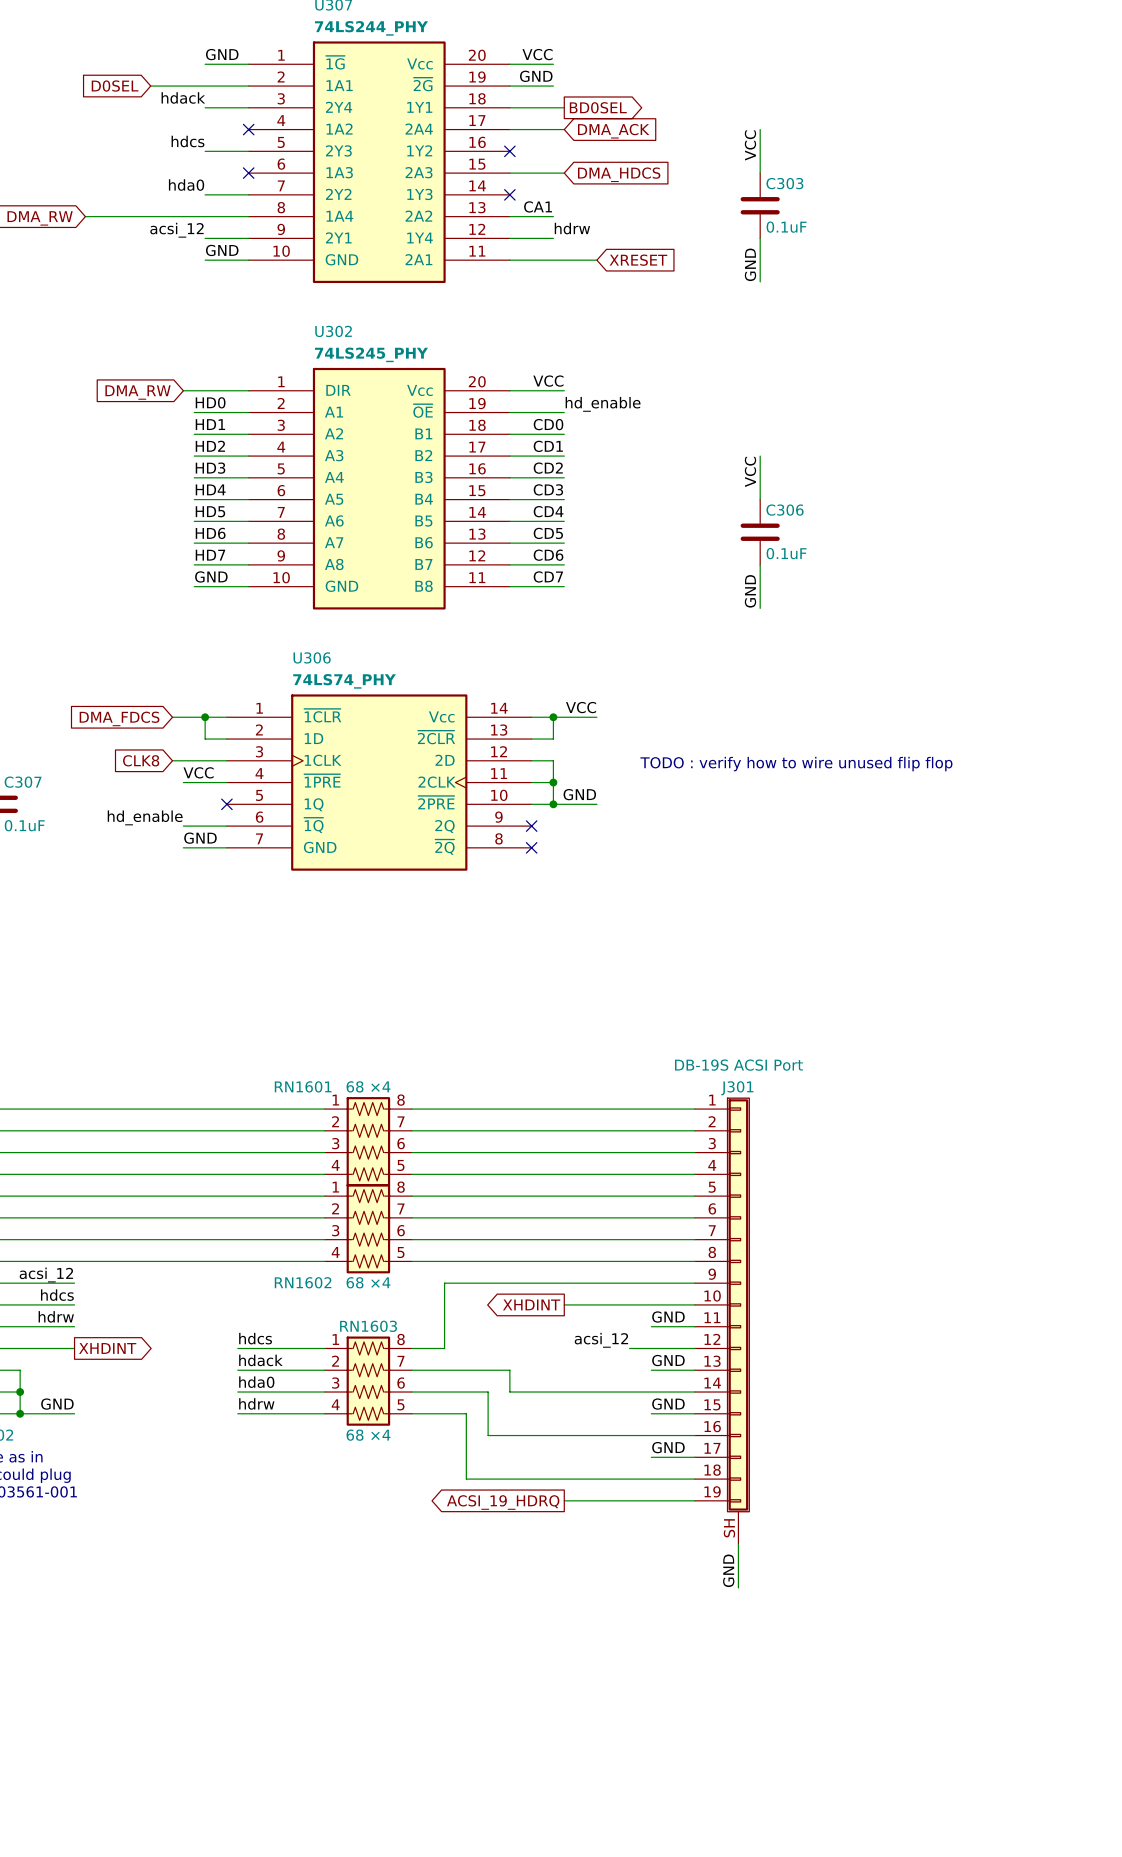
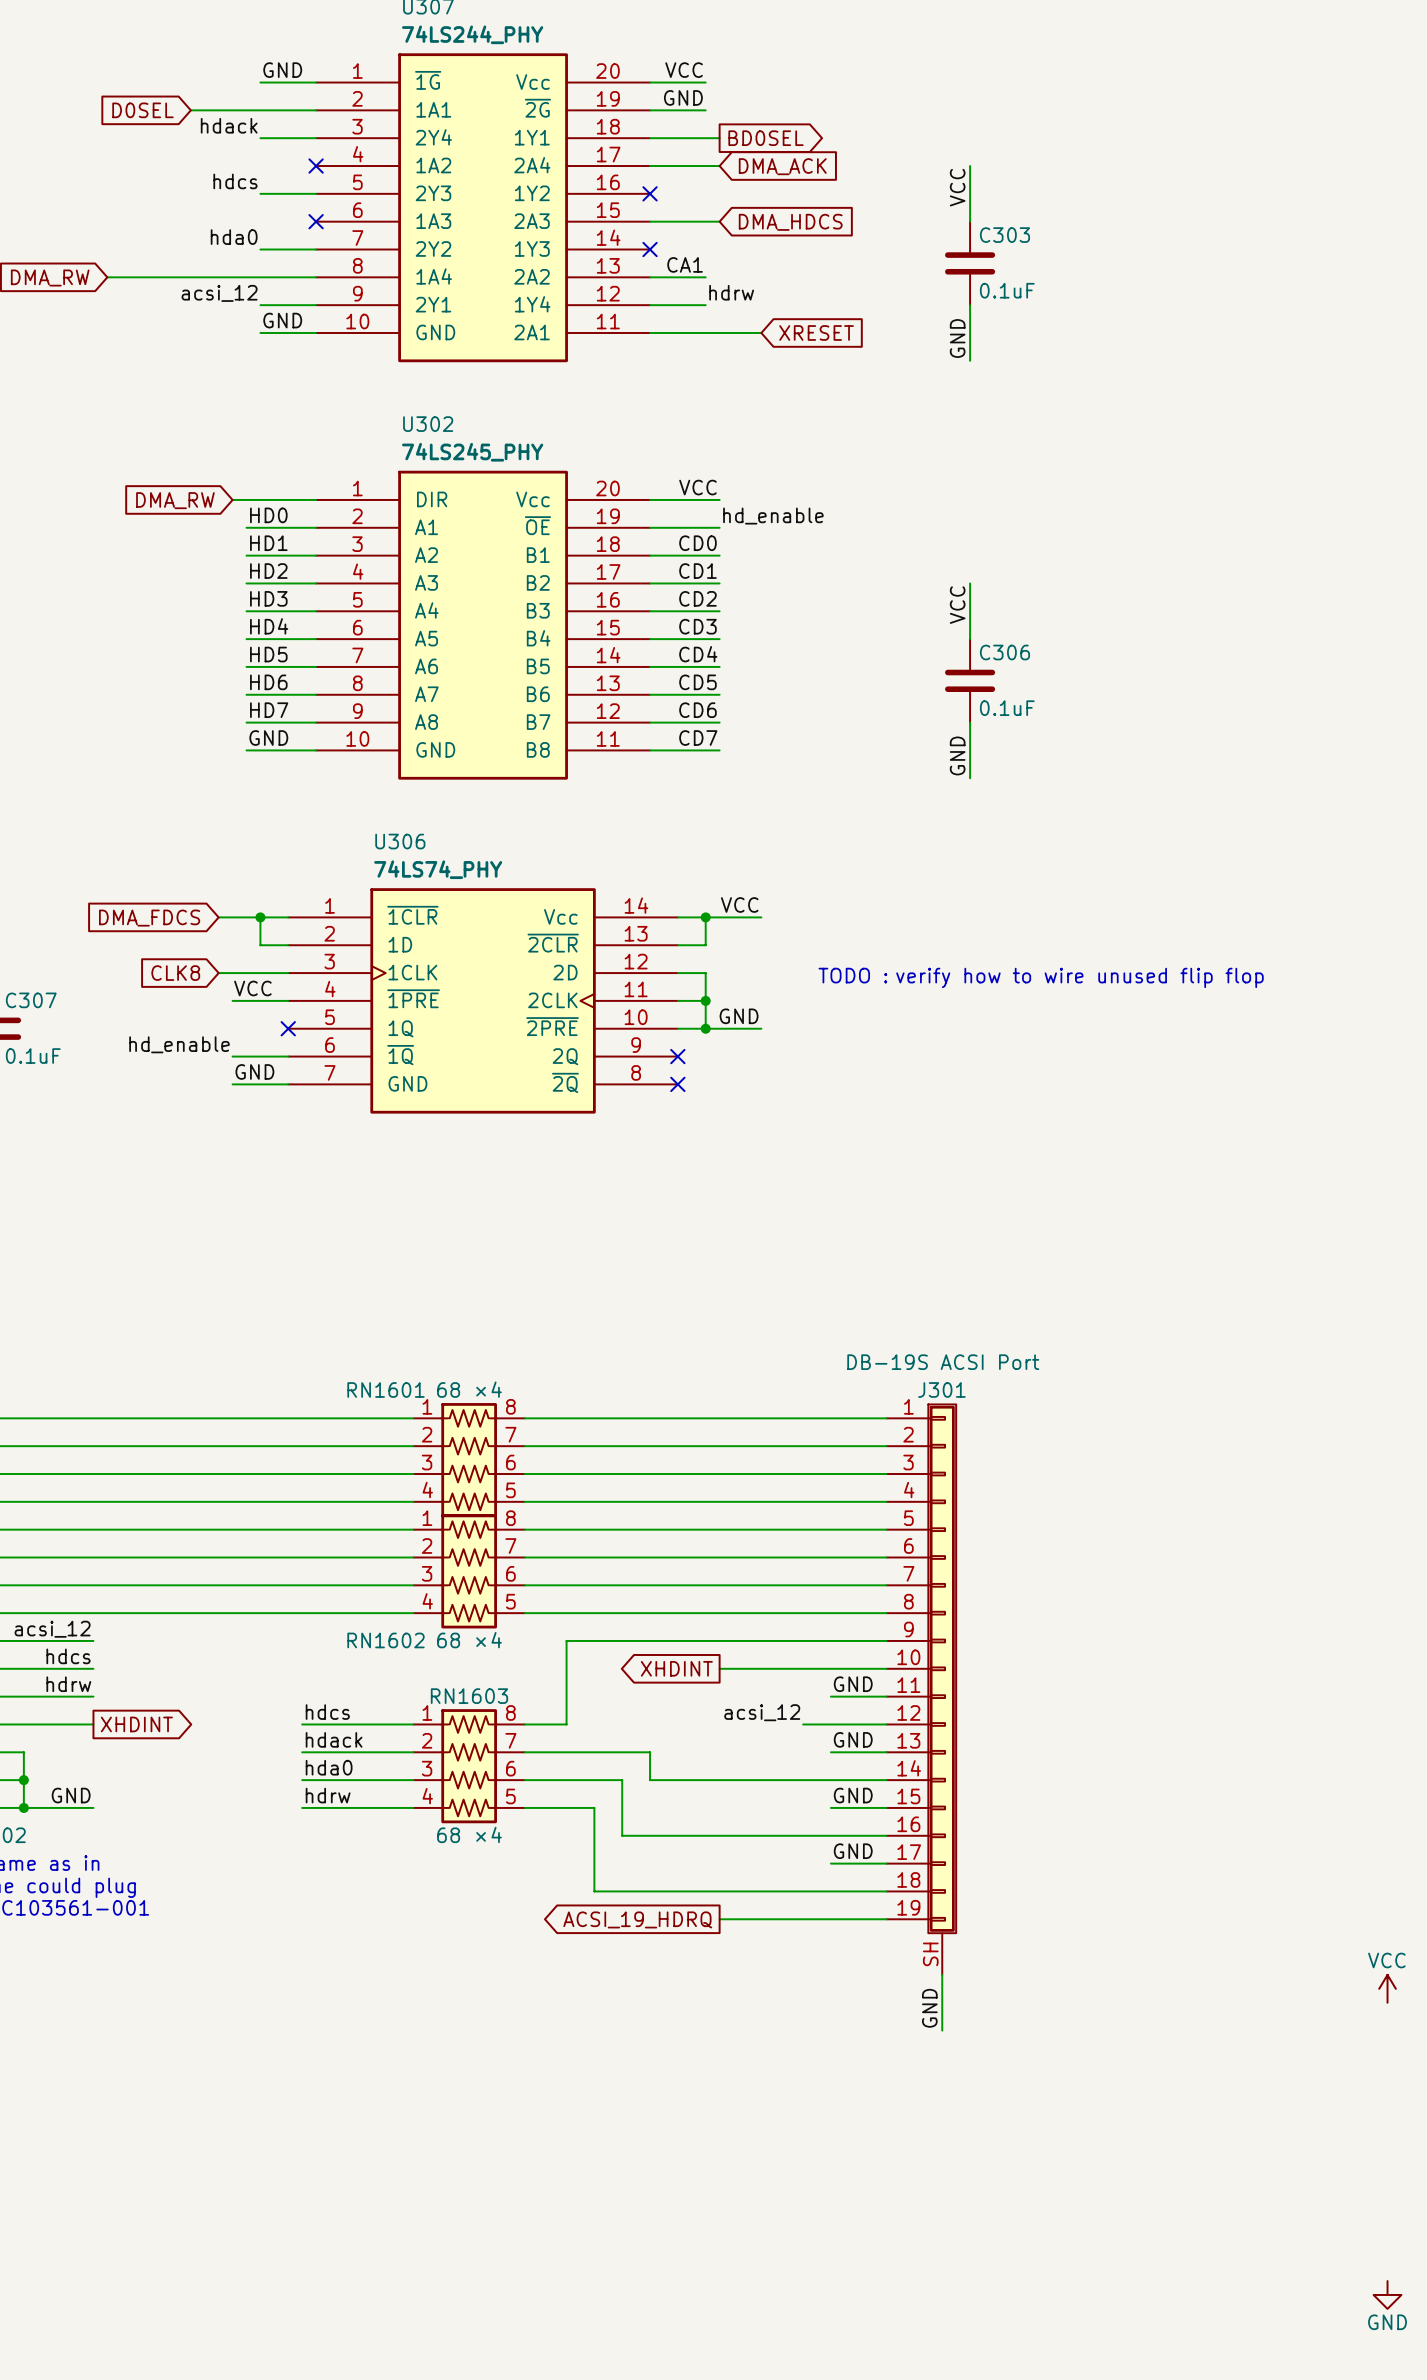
power symbol: none -> VCC (1387, 1988)
power symbol: none -> GND (1387, 2294)

